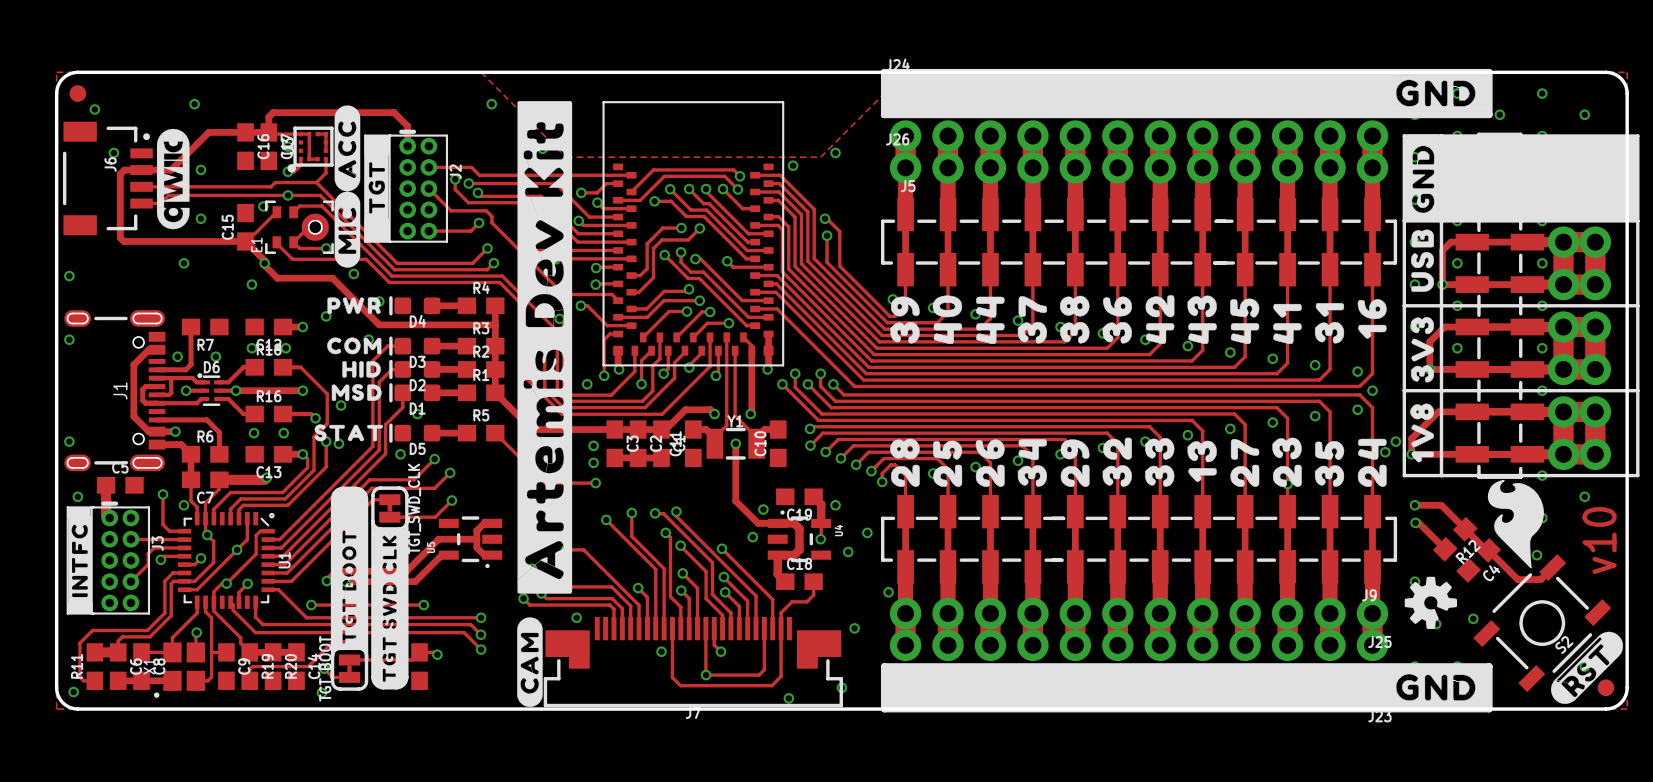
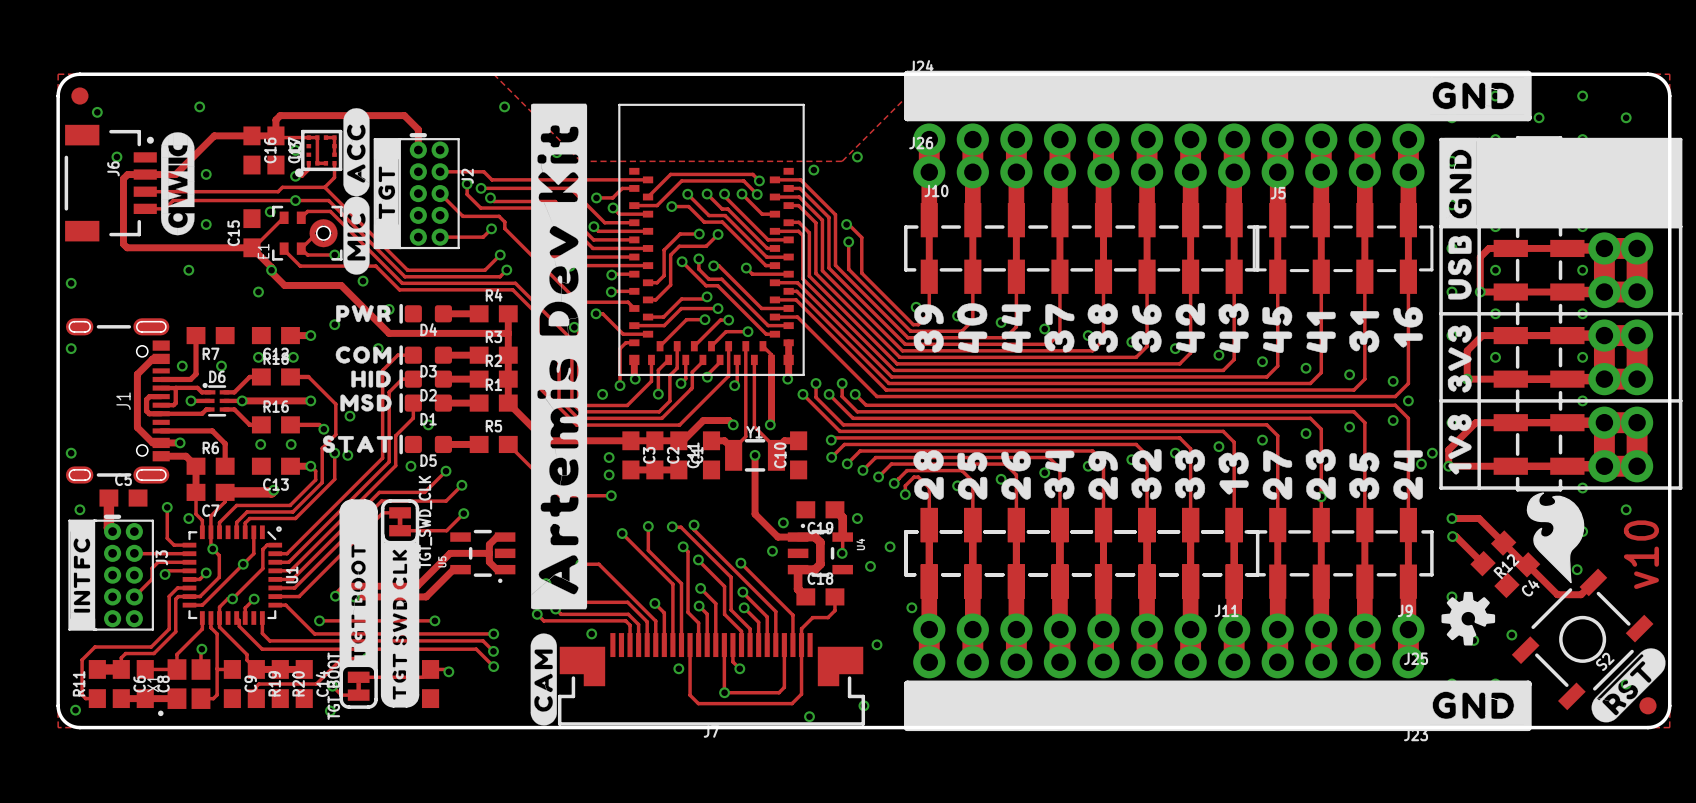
J5 name position: J5 (908, 186) -> J5 (1278, 193)
J5 footprint: [880, 197, 1398, 287] -> [1252, 203, 1434, 294]
J10: none -> (1081, 248)
J11: none -> (1081, 553)

